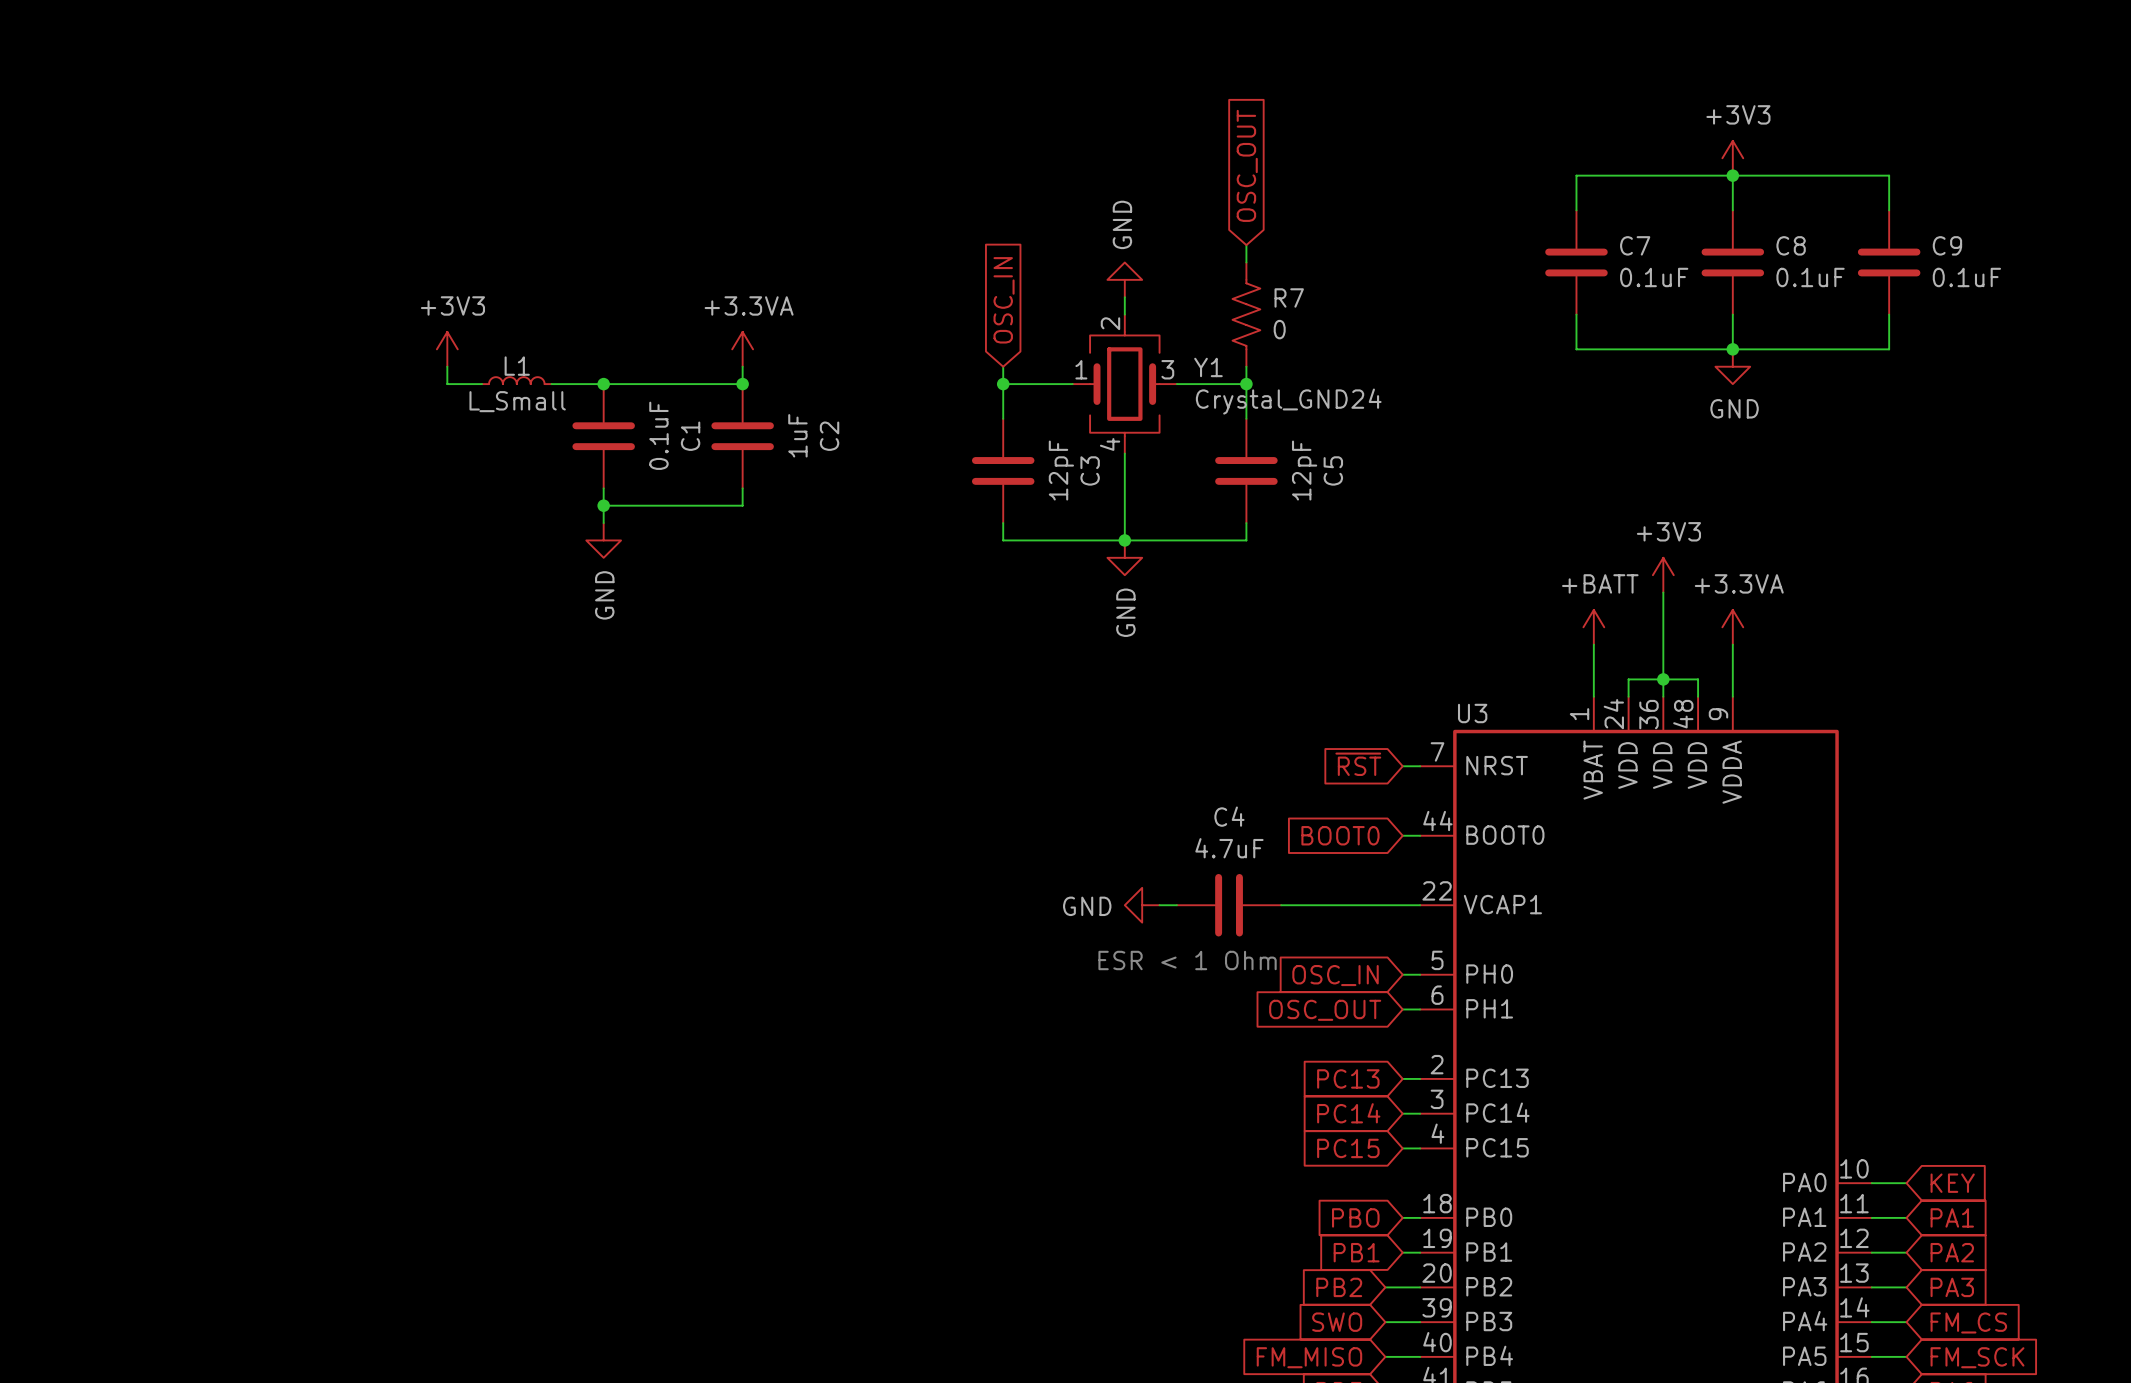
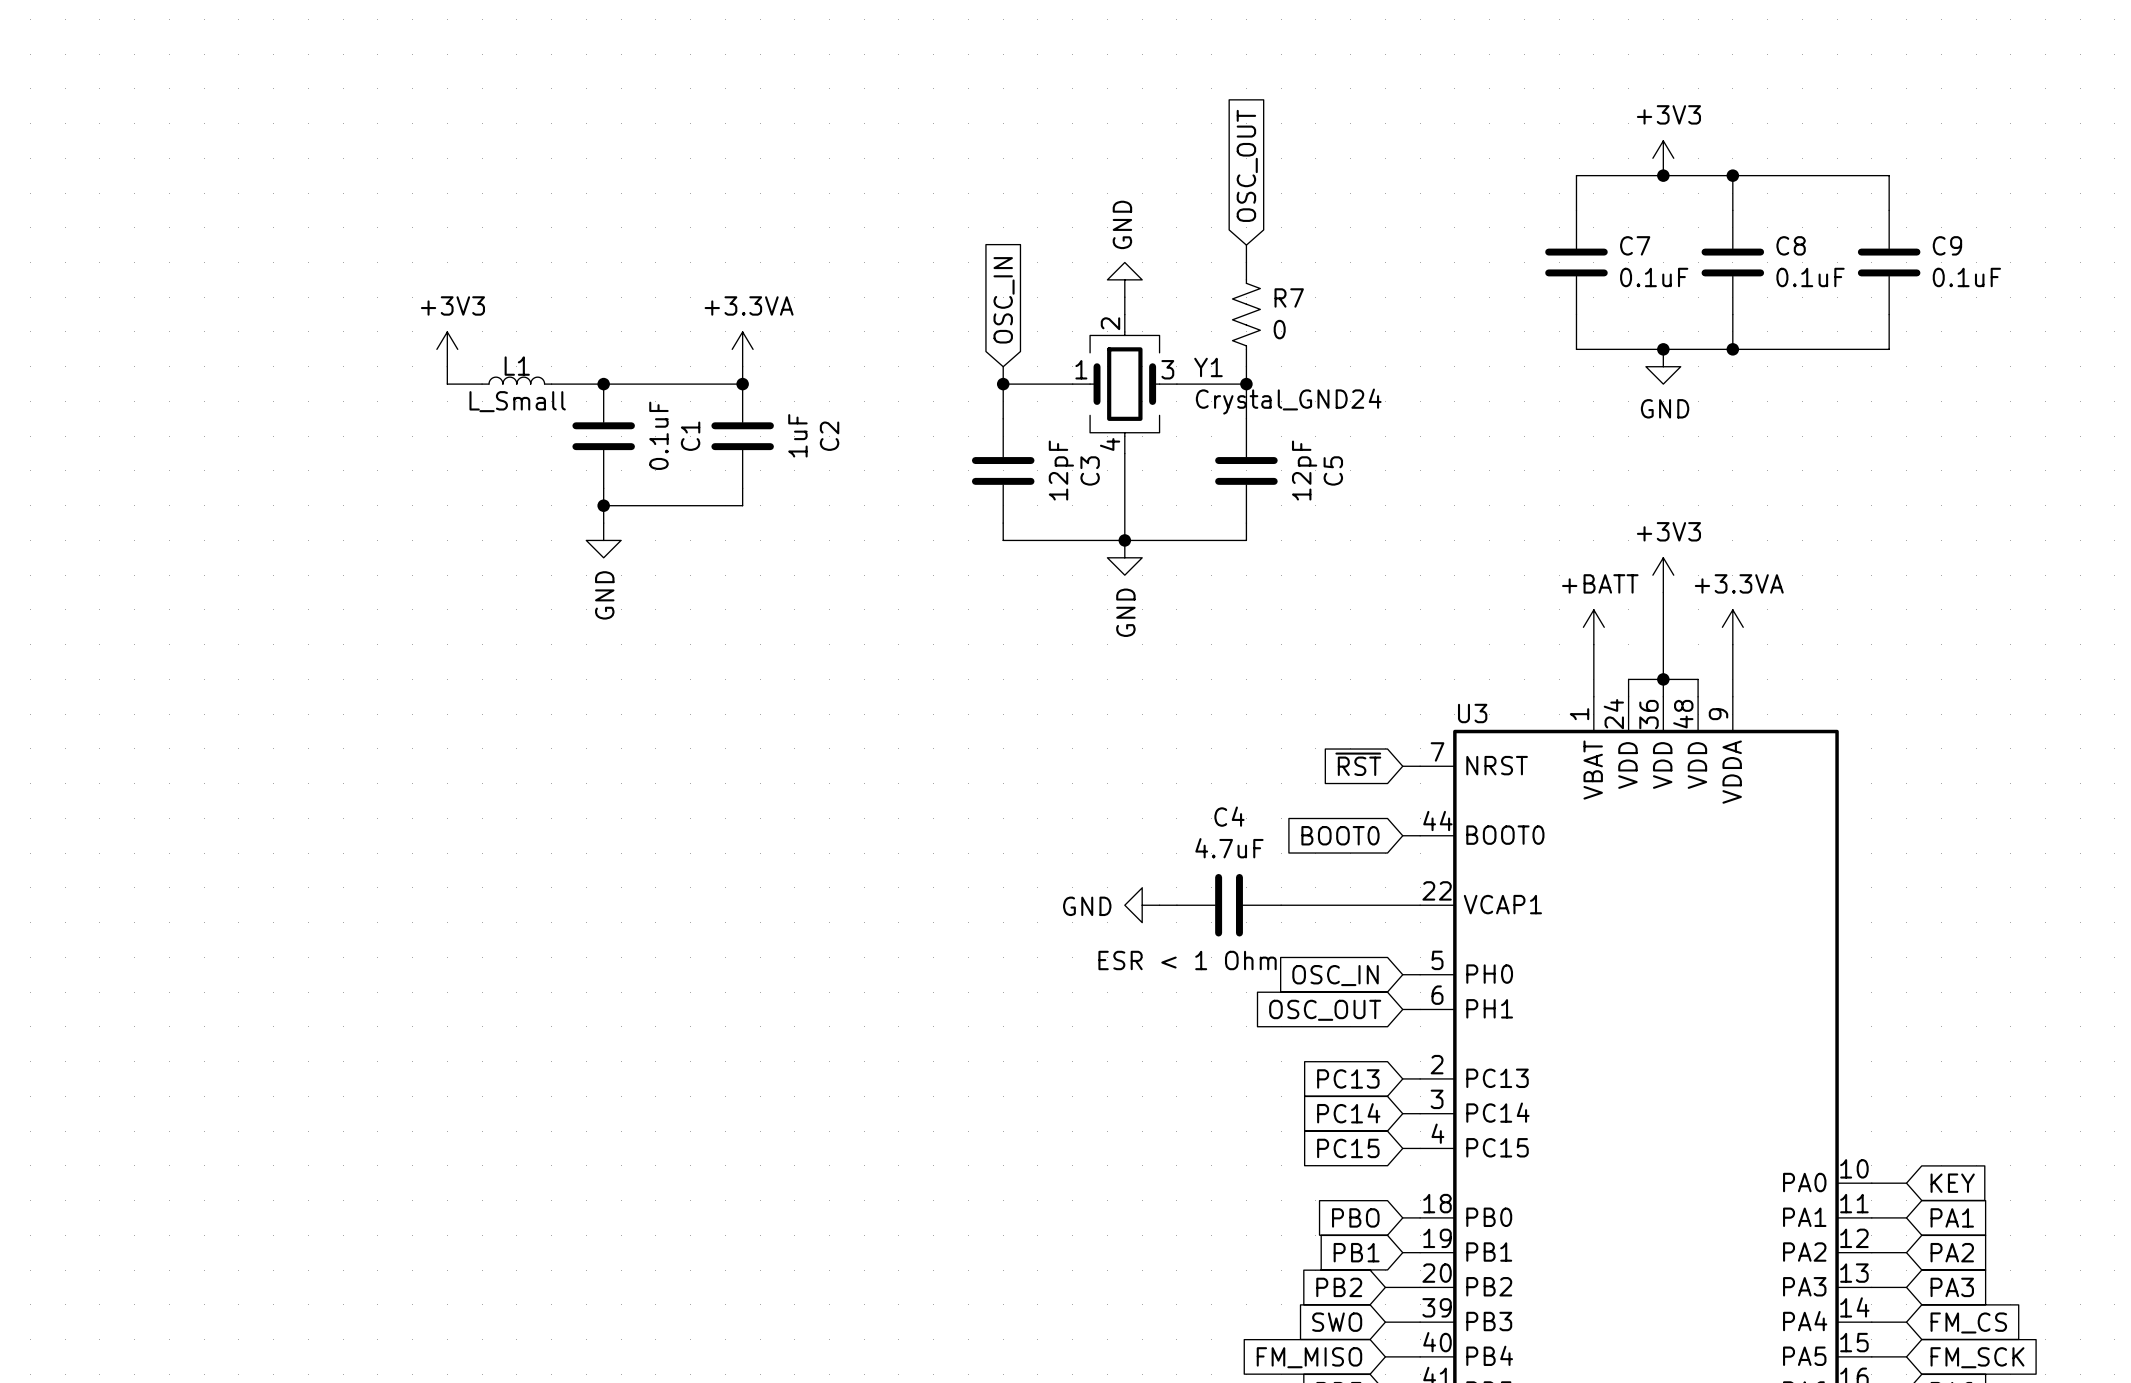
power symbol position: +3V3 (1732, 158) -> +3V3 (1663, 158)
junction: none -> (1663, 175)
junction: none -> (1663, 349)
power symbol position: GND (1732, 366) -> GND (1663, 366)

